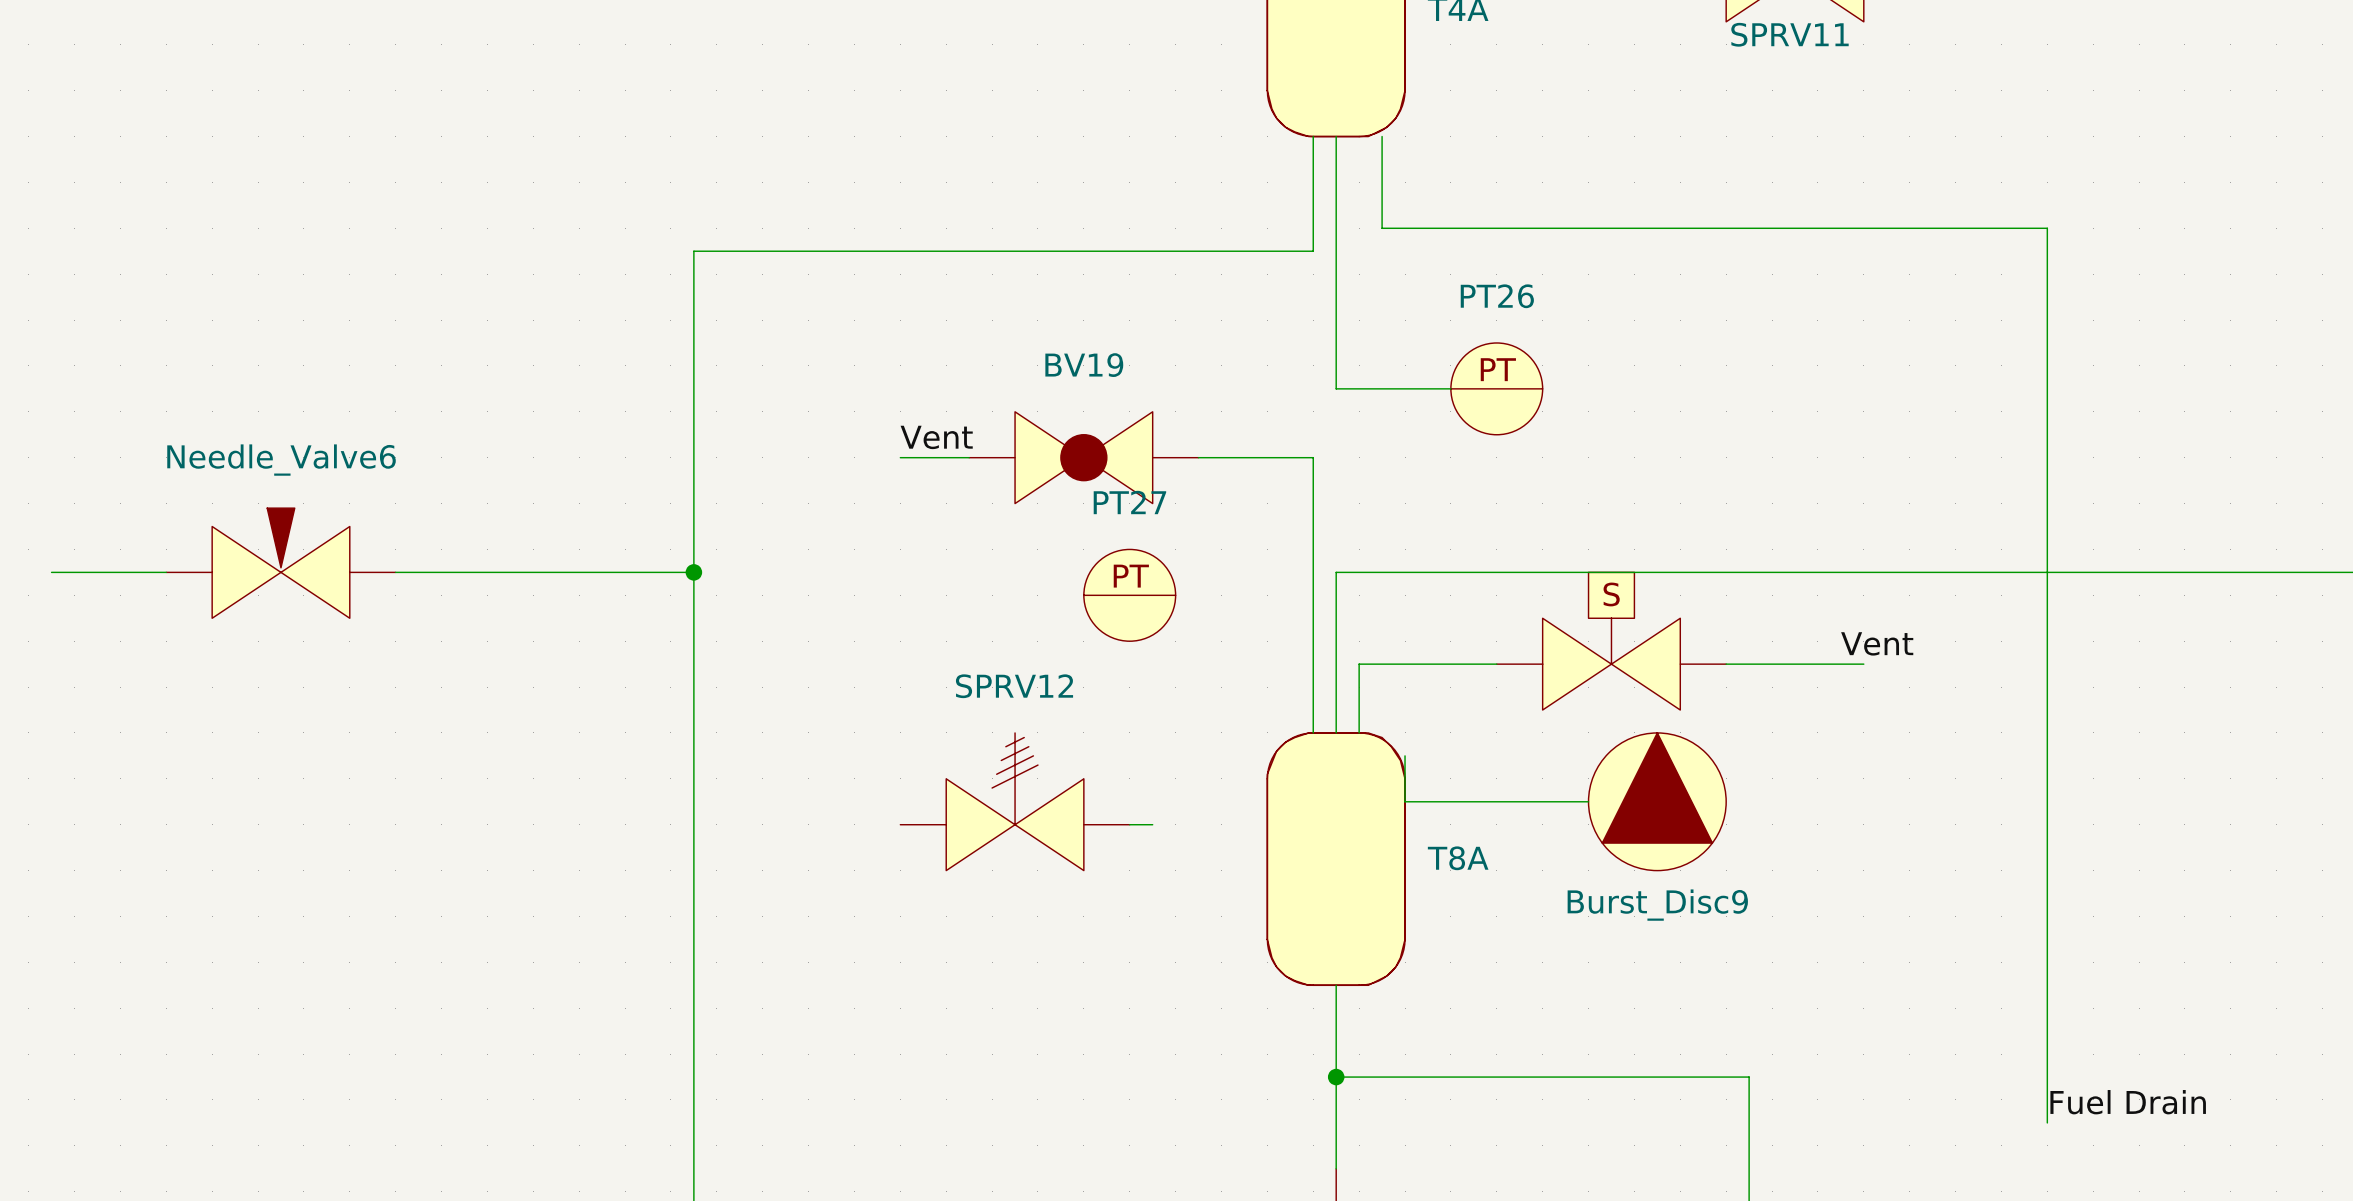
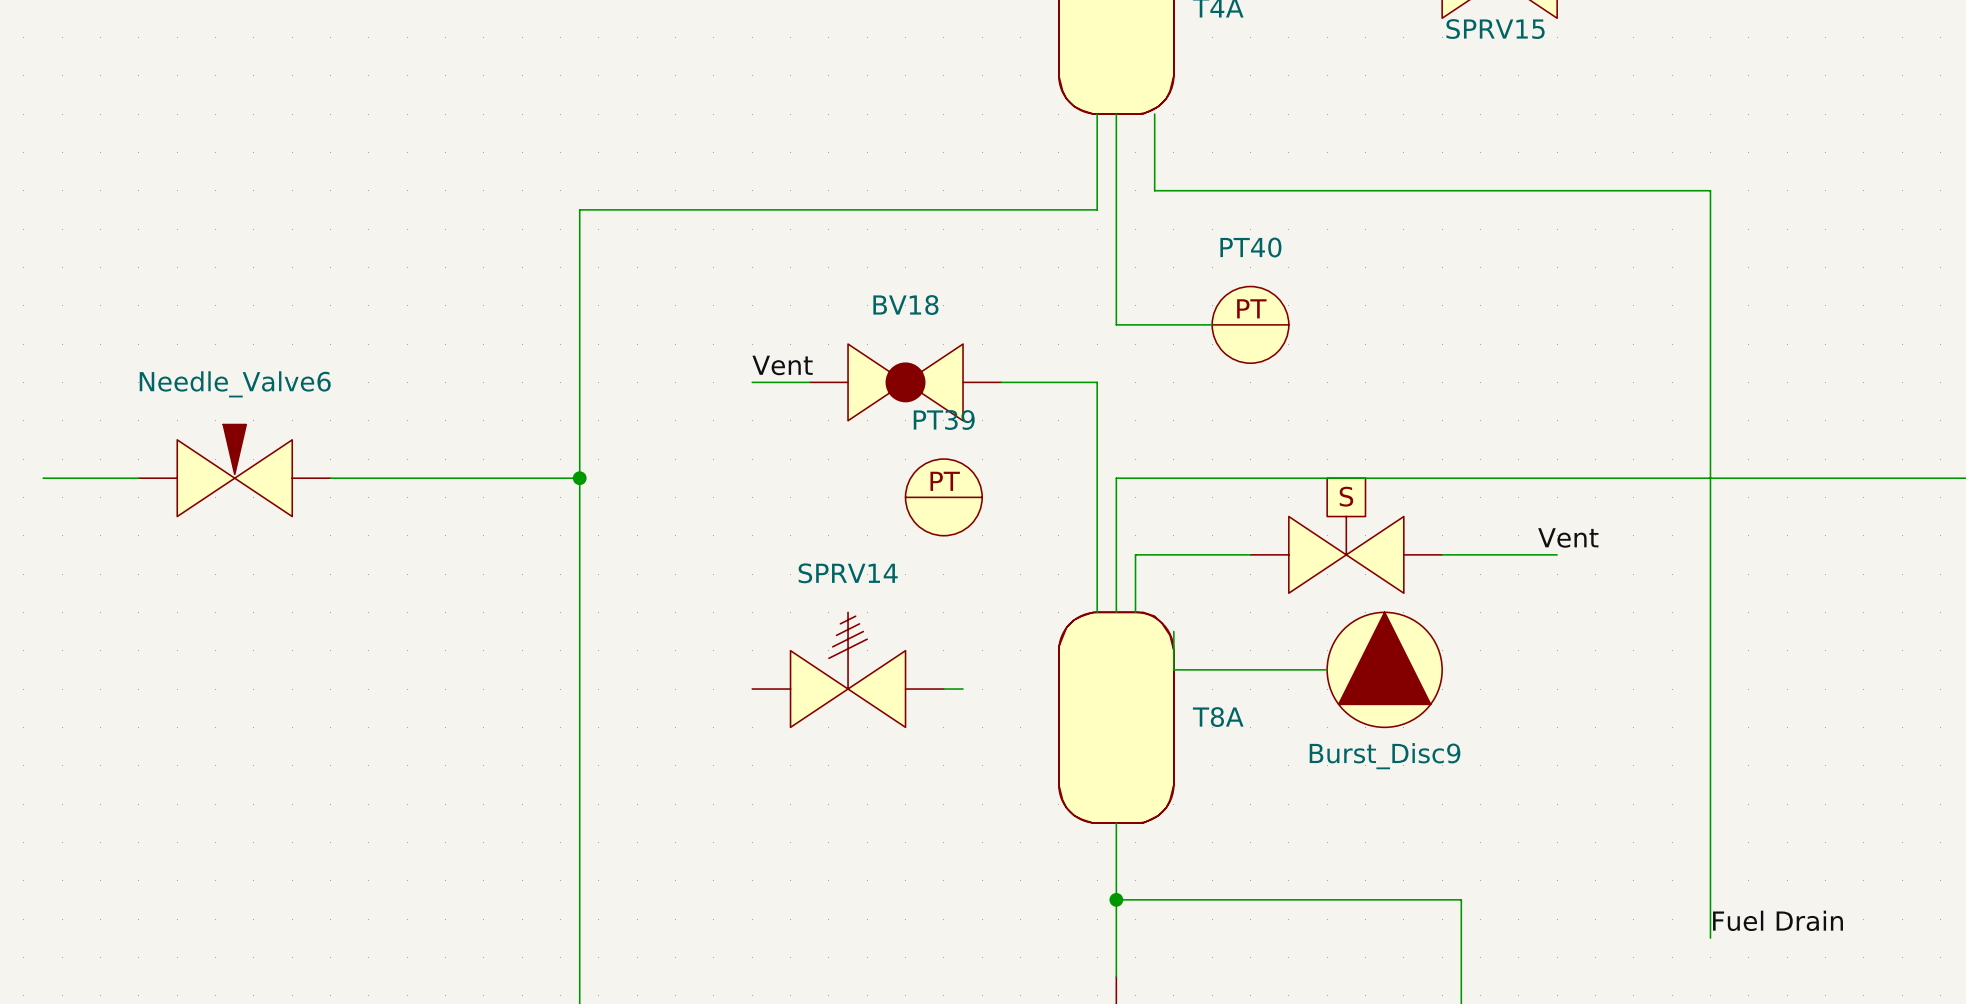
SPRV11 name: SPRV11 (1789, 34) -> SPRV15 (1495, 29)
PT26 name: PT26 (1497, 296) -> PT40 (1250, 247)
BV19 name: BV19 (1084, 365) -> BV18 (905, 305)
PT27 name: PT27 (1129, 502) -> PT39 (944, 420)
SPRV12 name: SPRV12 (1014, 686) -> SPRV14 (848, 573)

